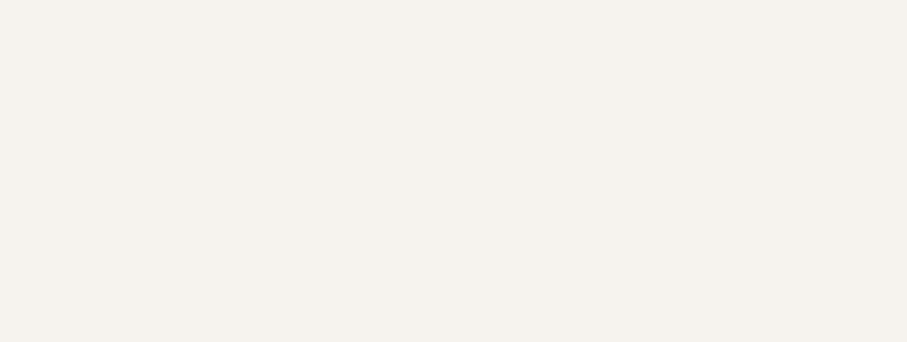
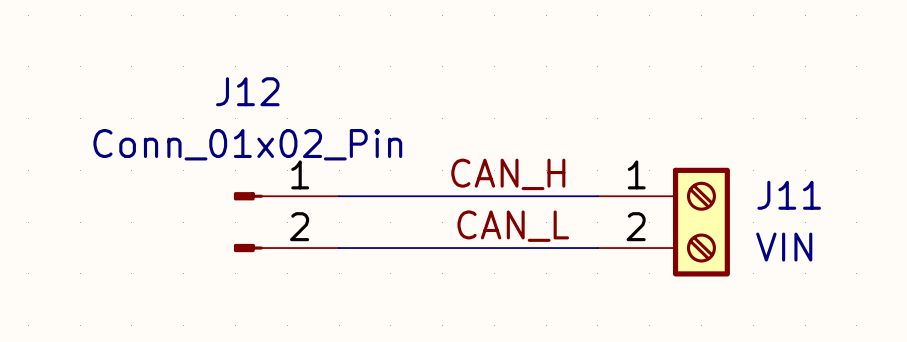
label: none -> CAN_H (508, 174)
wire: none -> (339, 196) (597, 196)
J12: none -> Conn_01x02_Pin (286, 222)
J11: none -> VIN (663, 222)
label: none -> CAN_L (513, 226)
wire: none -> (339, 248) (597, 248)

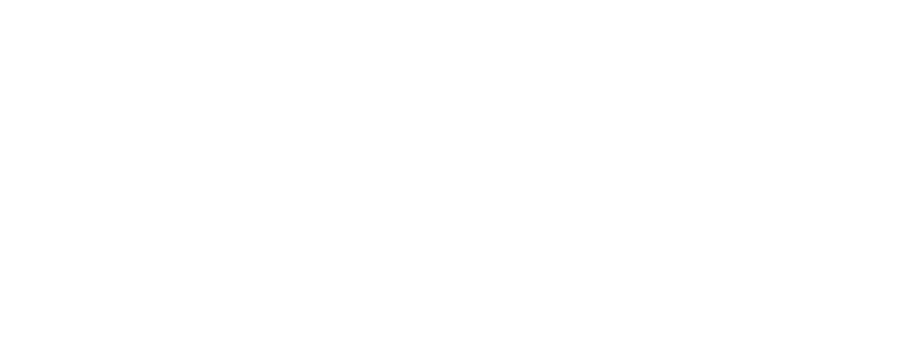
label: CAN_H (508, 174) -> none
wire: (339, 196) (597, 196) -> none
J12: Conn_01x02_Pin (286, 222) -> none
J11: VIN (663, 222) -> none
label: CAN_L (513, 226) -> none
wire: (339, 248) (597, 248) -> none

